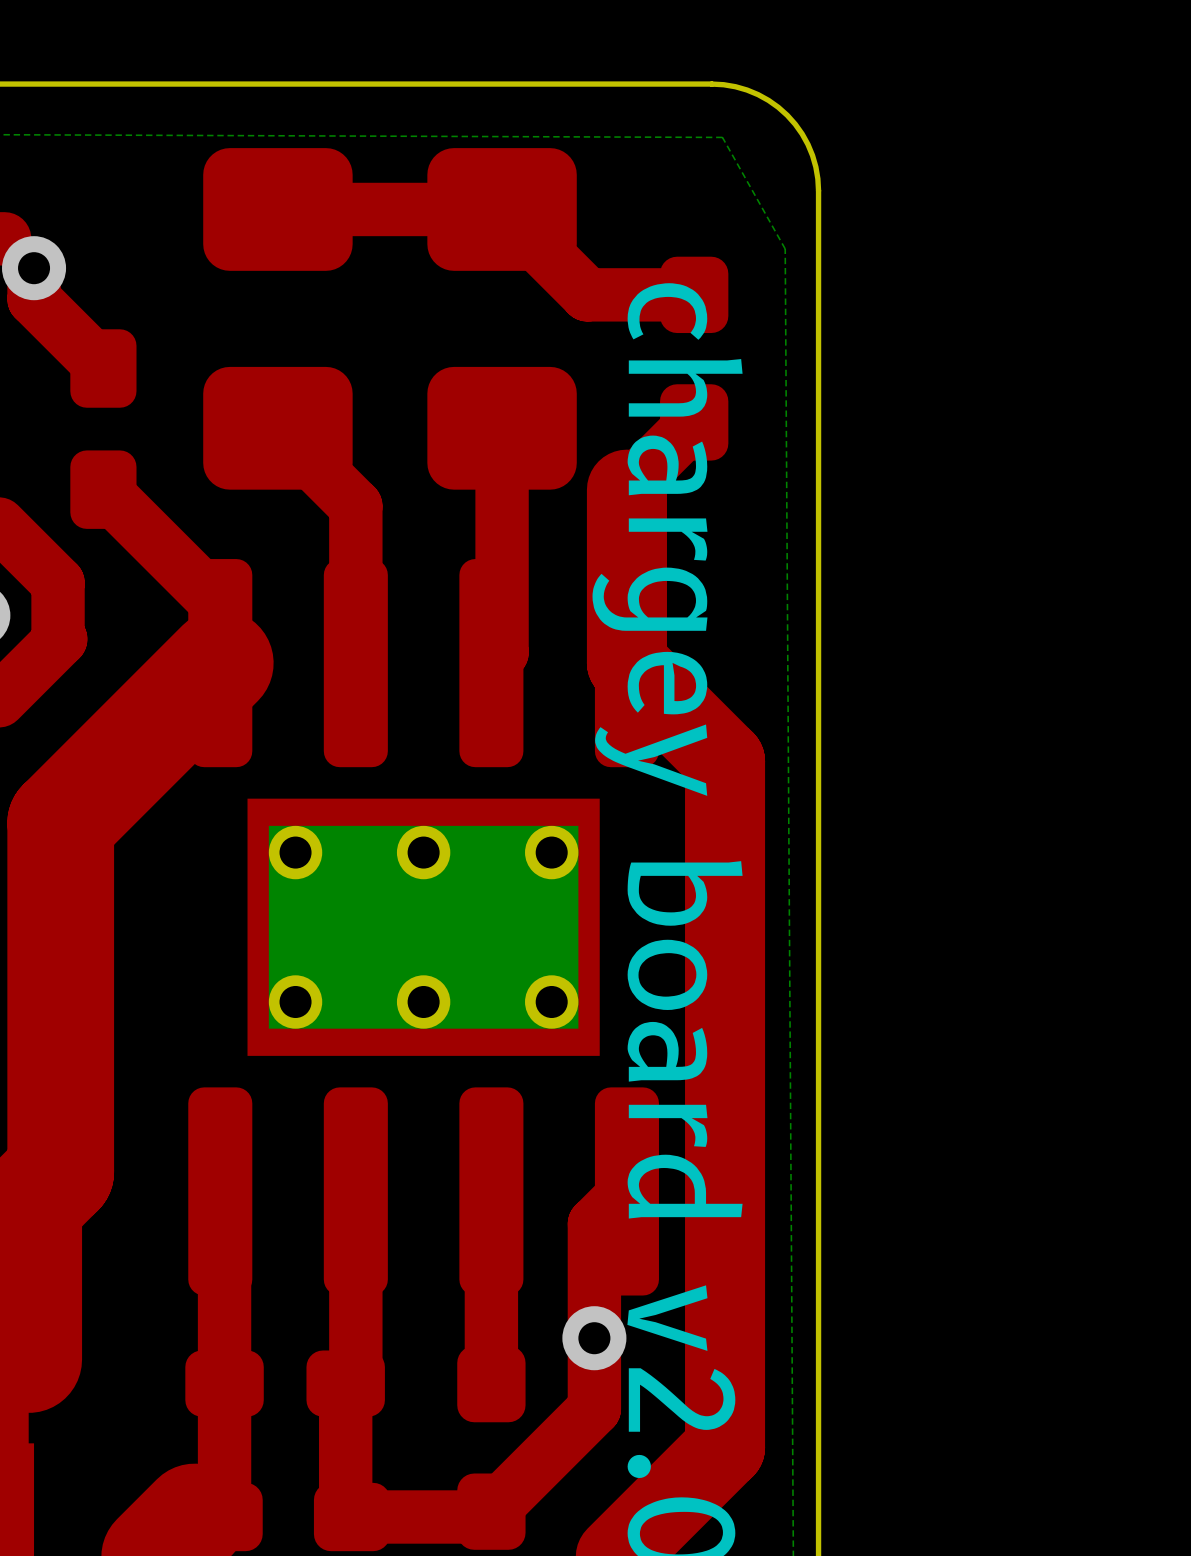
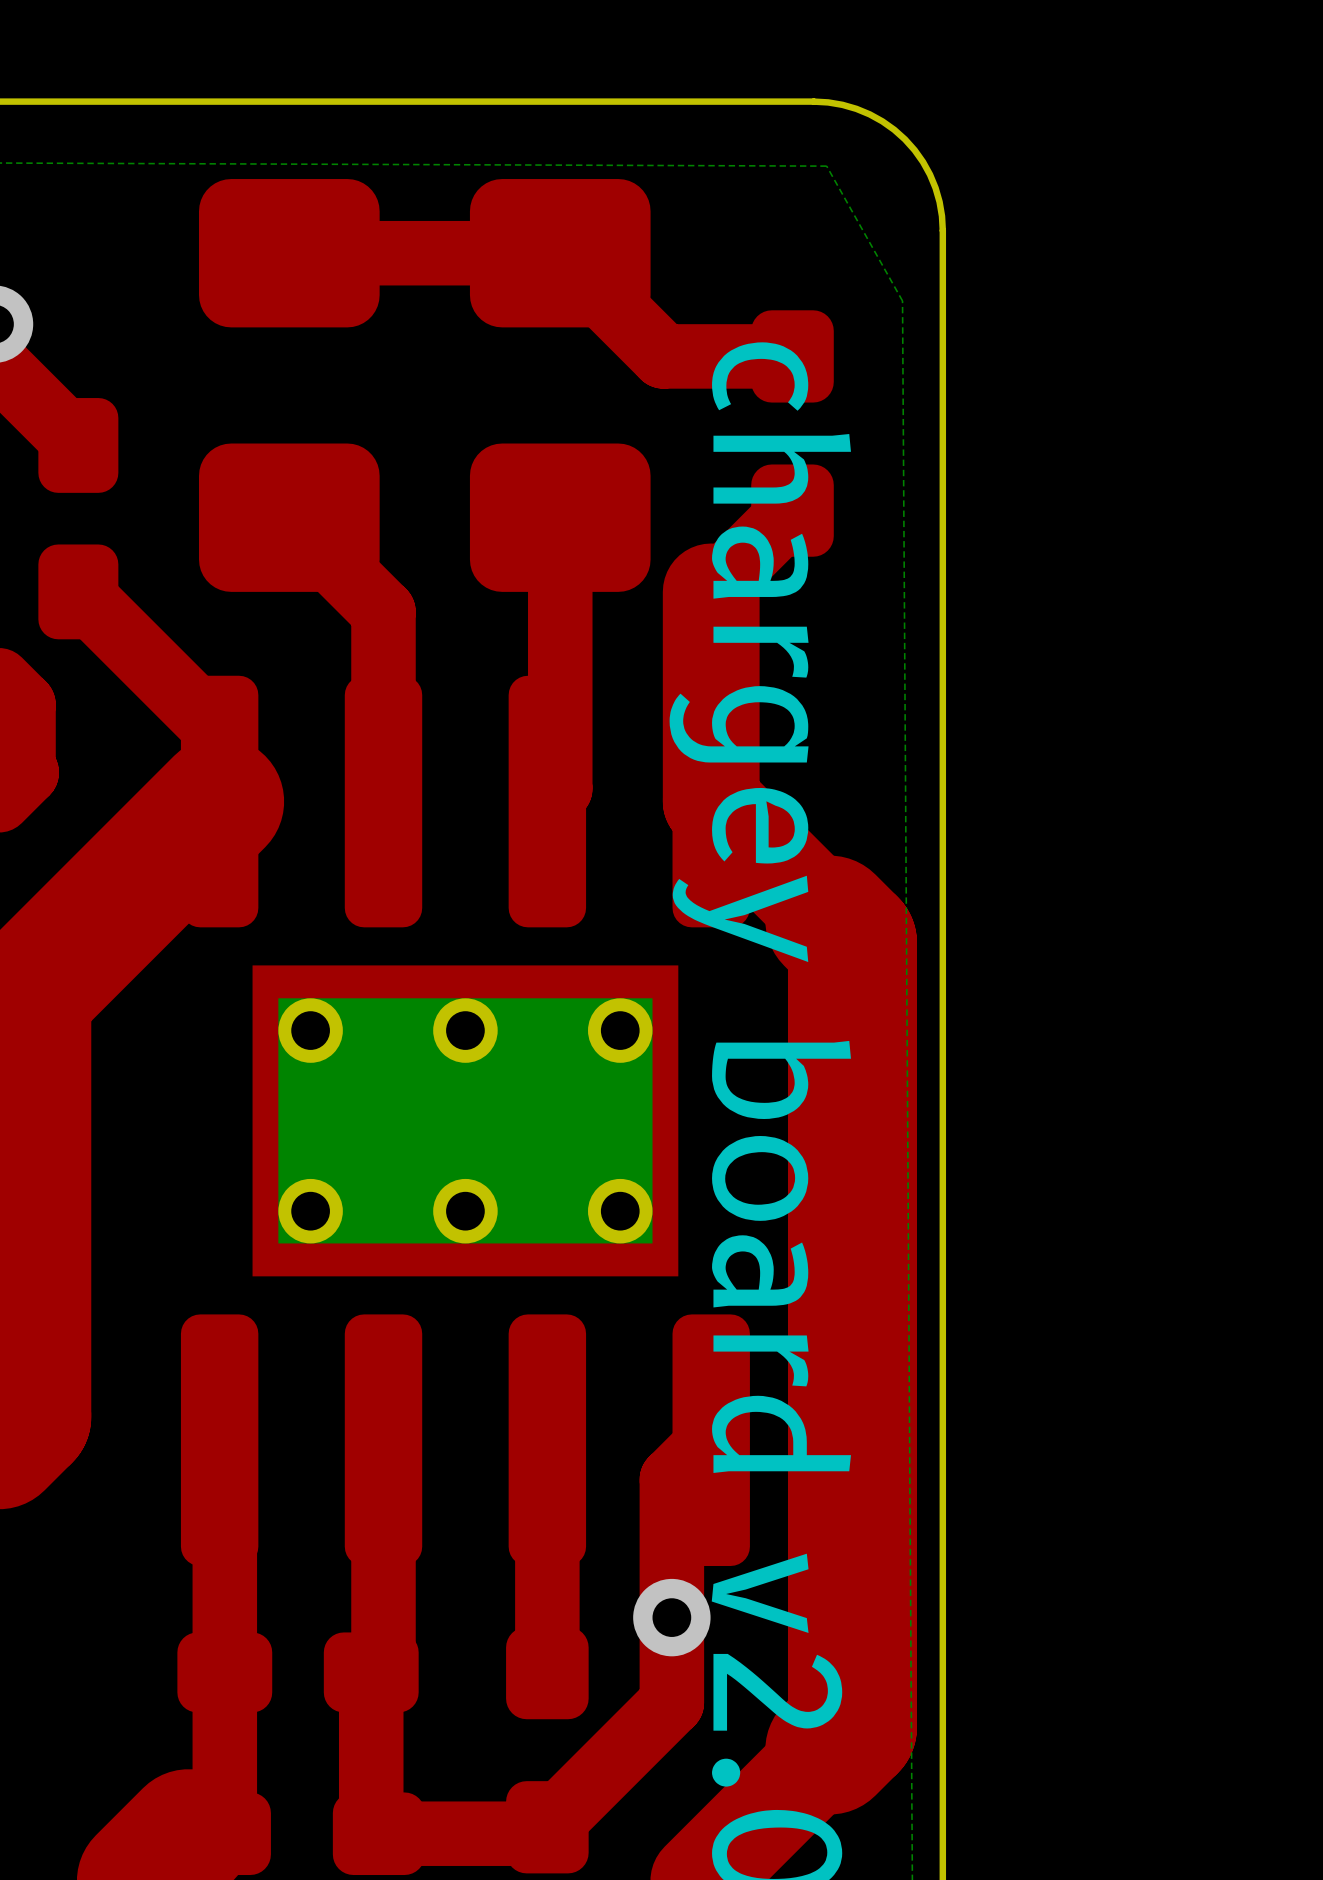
top track: (725, 761) (725, 1447) -> (829, 920) (852, 942) (852, 1727) (829, 1749)

